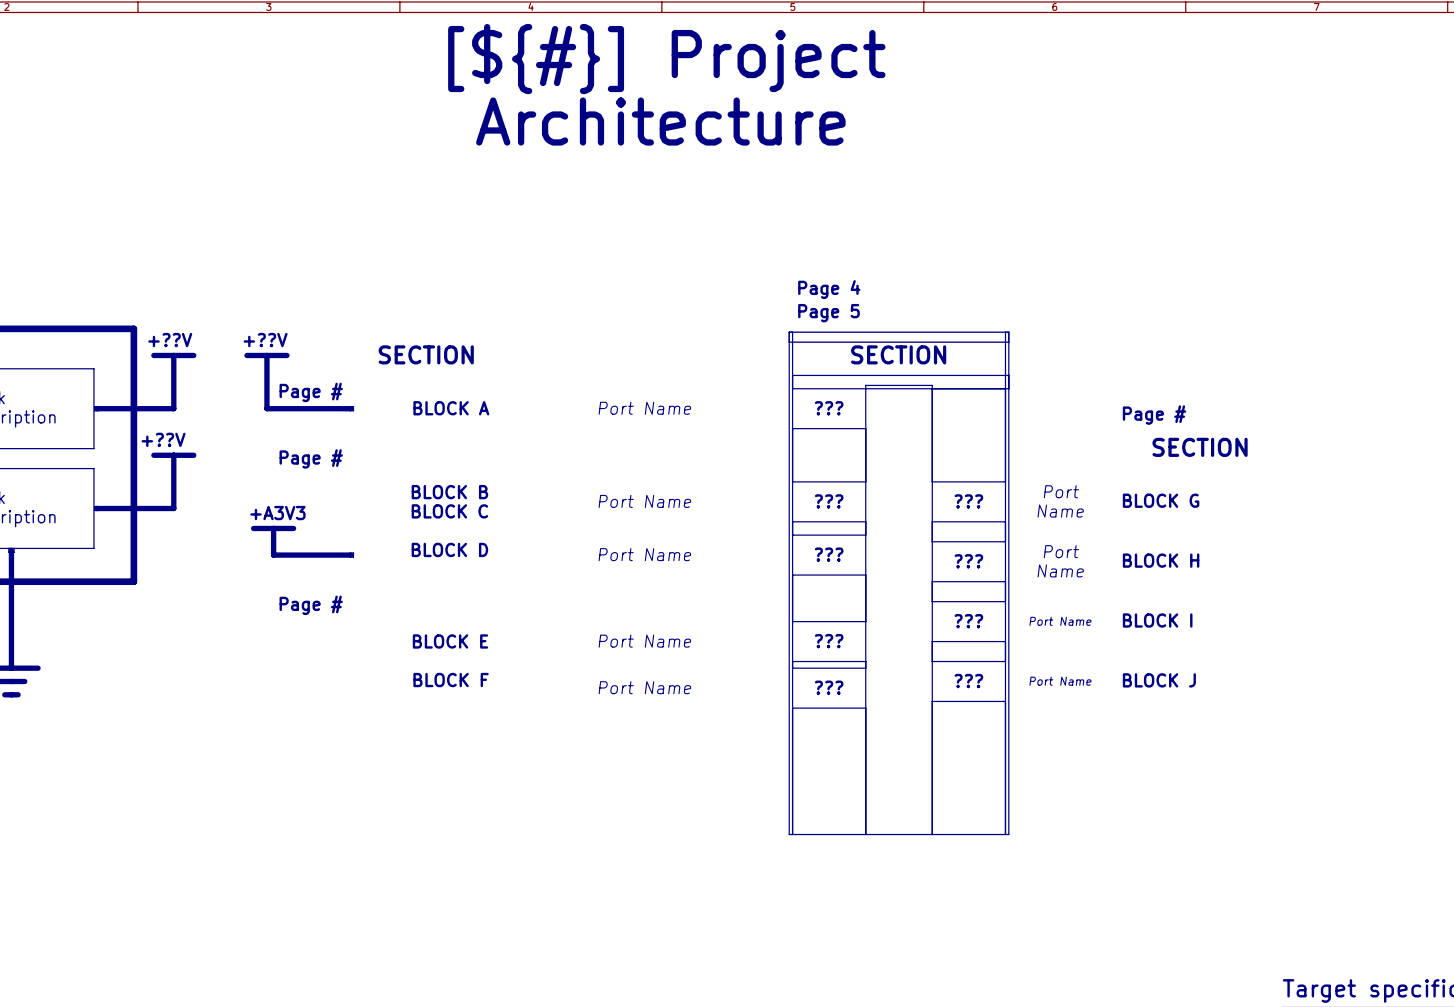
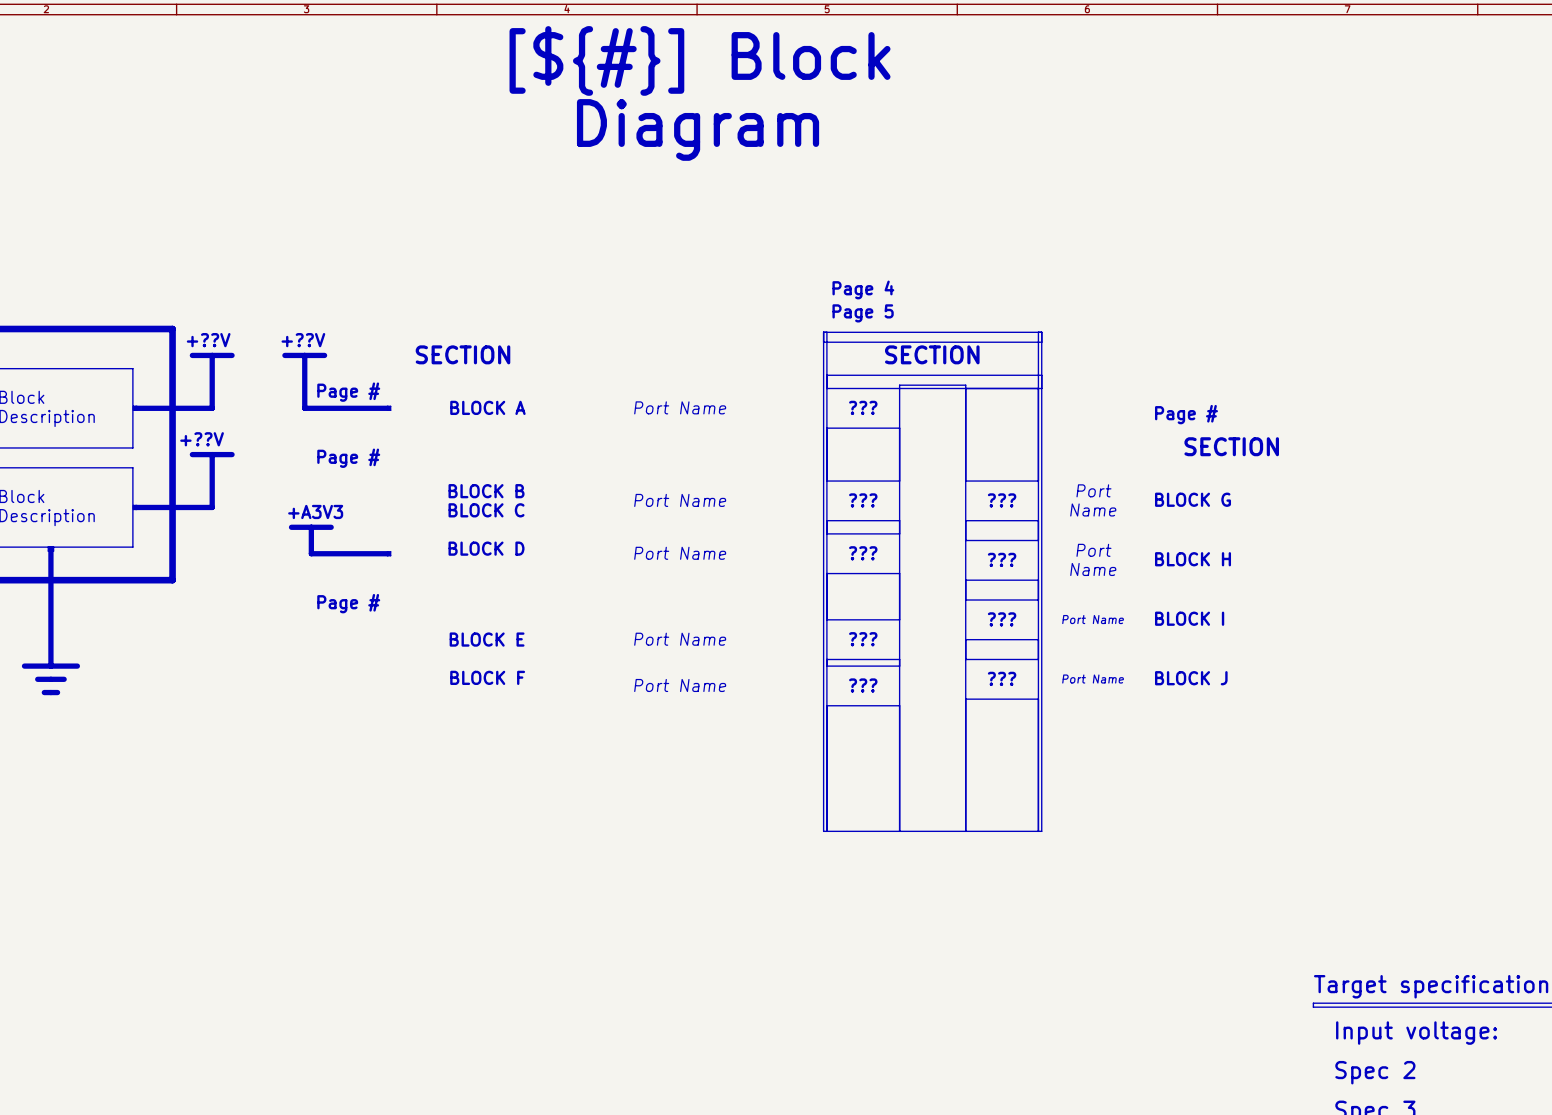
text: [${#}] Project (666, 59) -> [${#}] Block (700, 60)
text: Architecture (660, 121) -> Diagram (698, 129)

